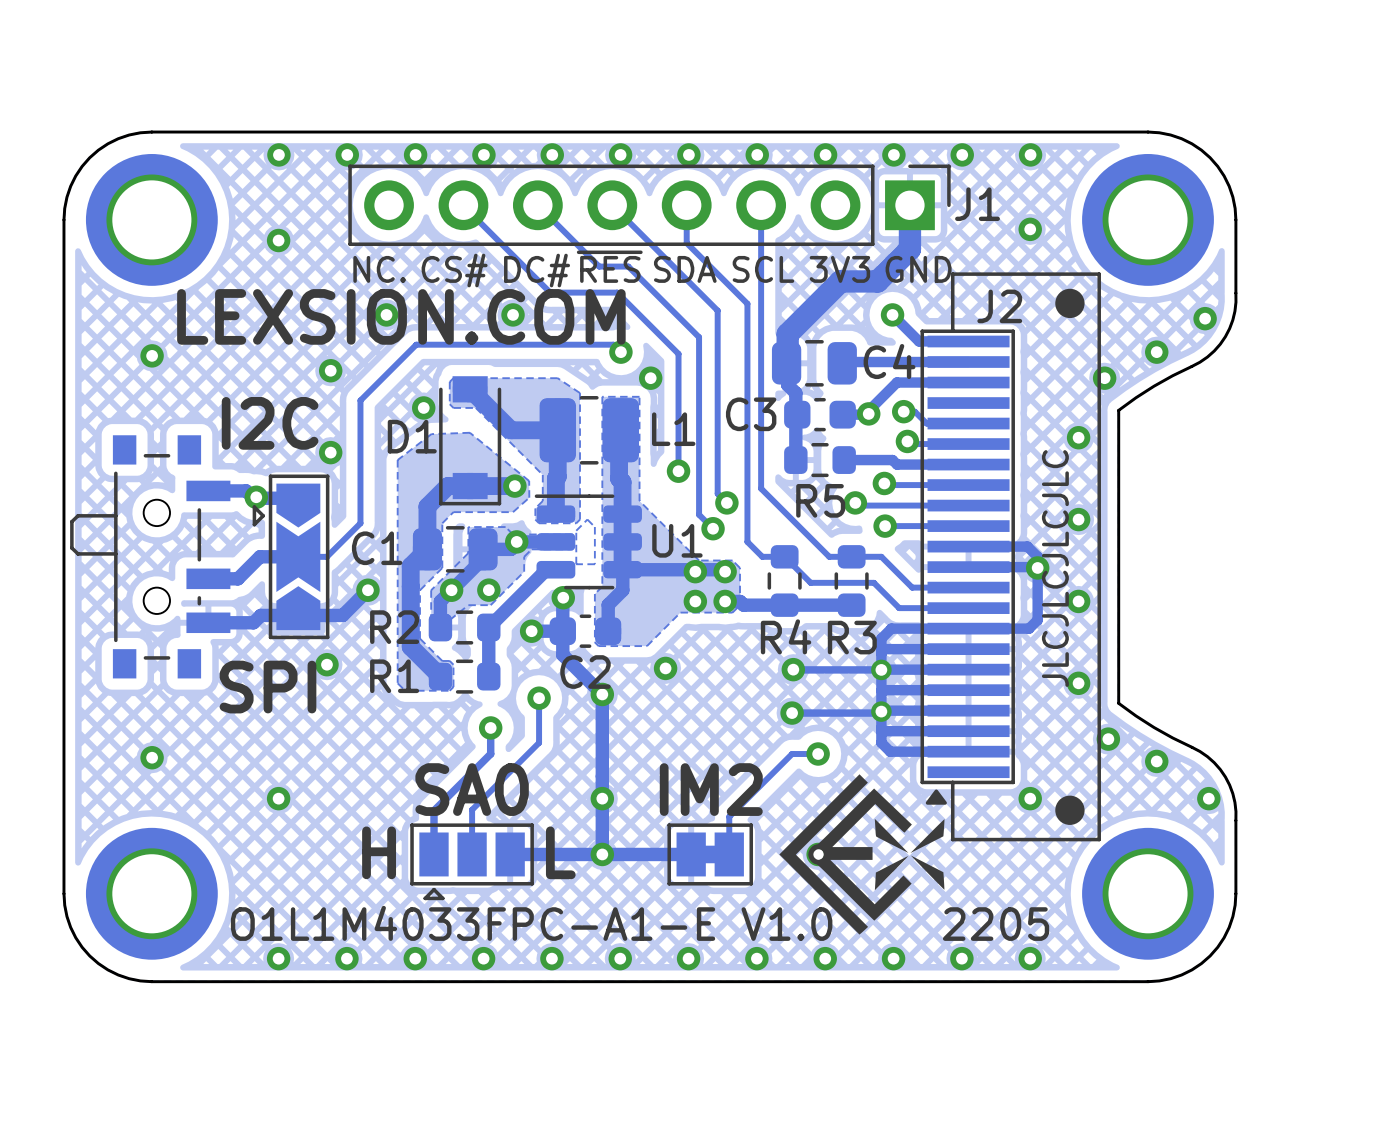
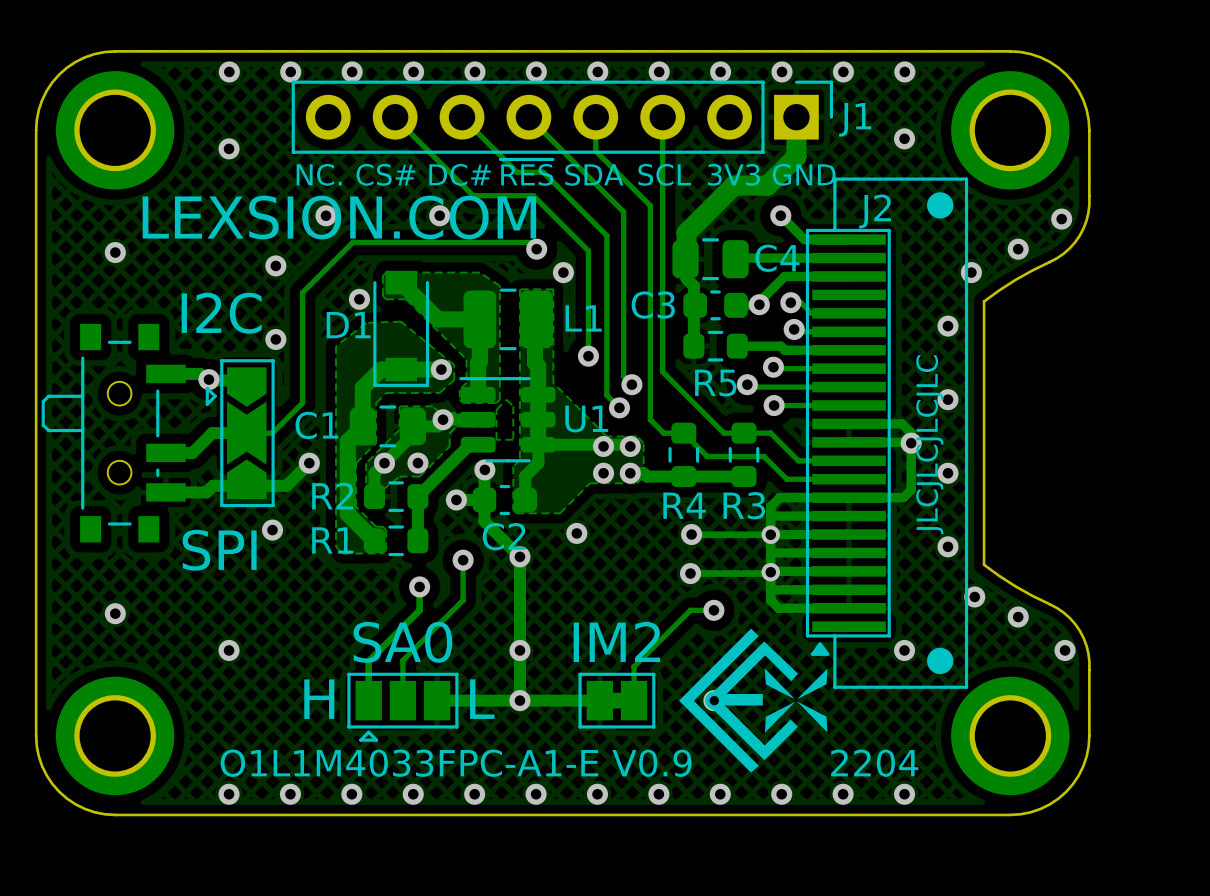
text: O1L1M4033FPC-A1-E V1.0 (531, 923) -> O1L1M4033FPC-A1-E V0.9 (456, 763)
text: 2205 (996, 924) -> 2204 (874, 763)

